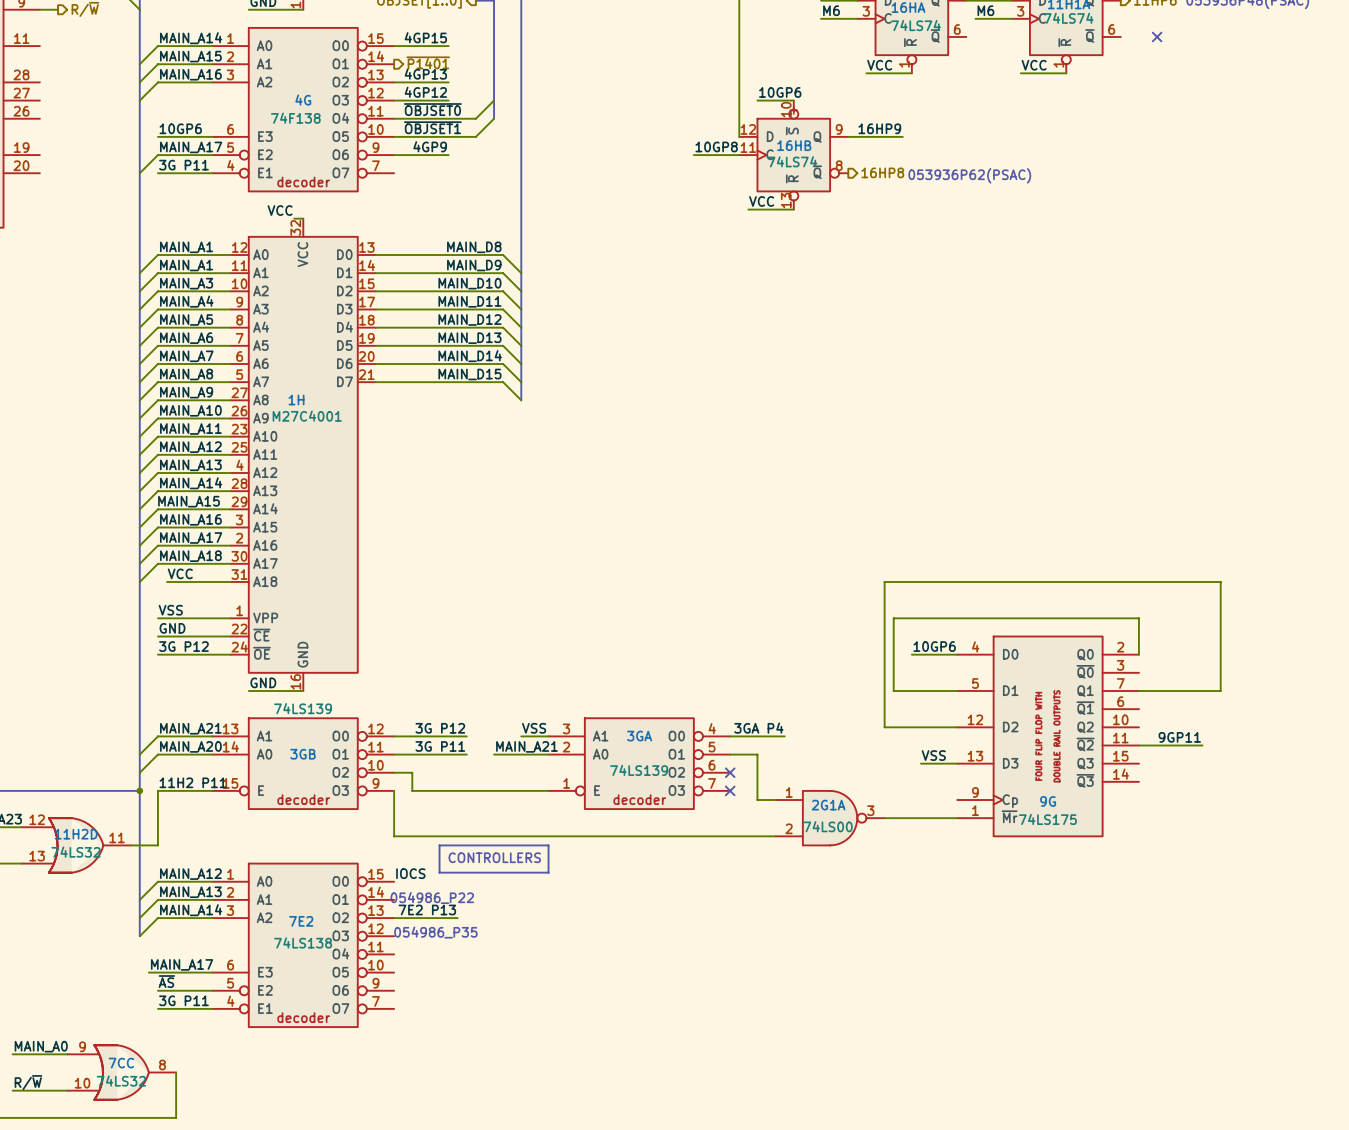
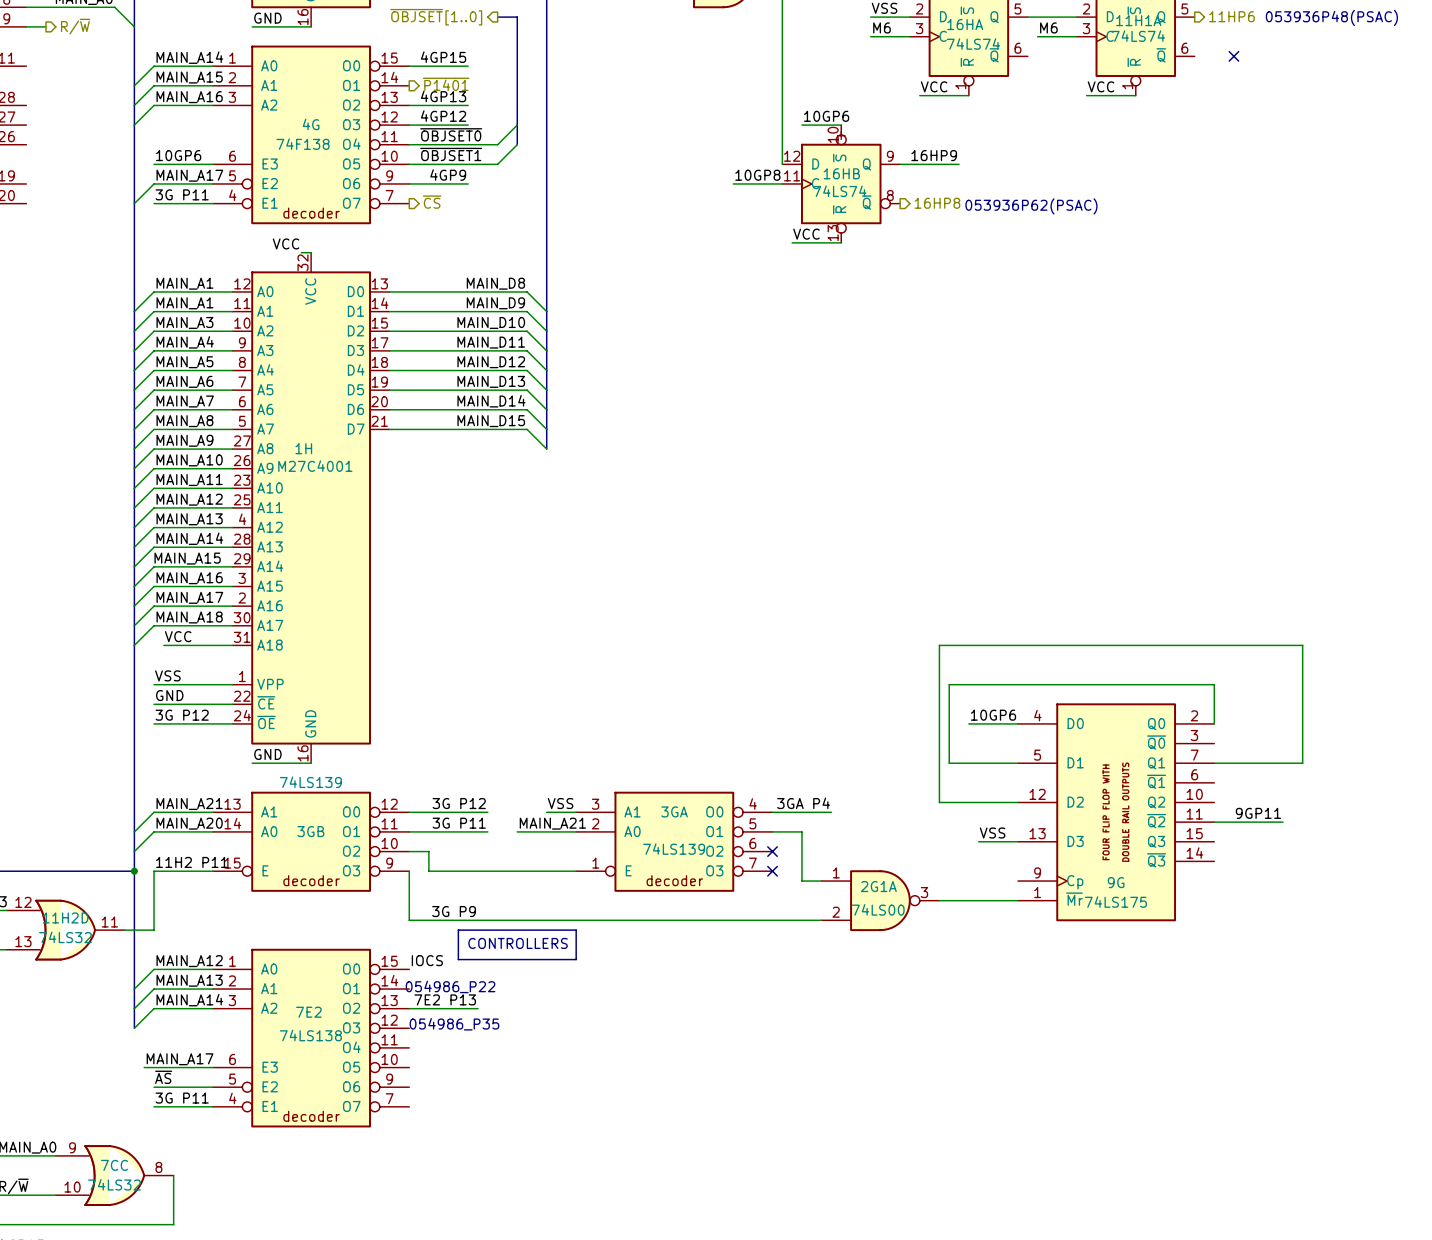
hierarchical label: none -> ~{CS} (432, 202)
label: none -> 3G P9 (454, 911)

